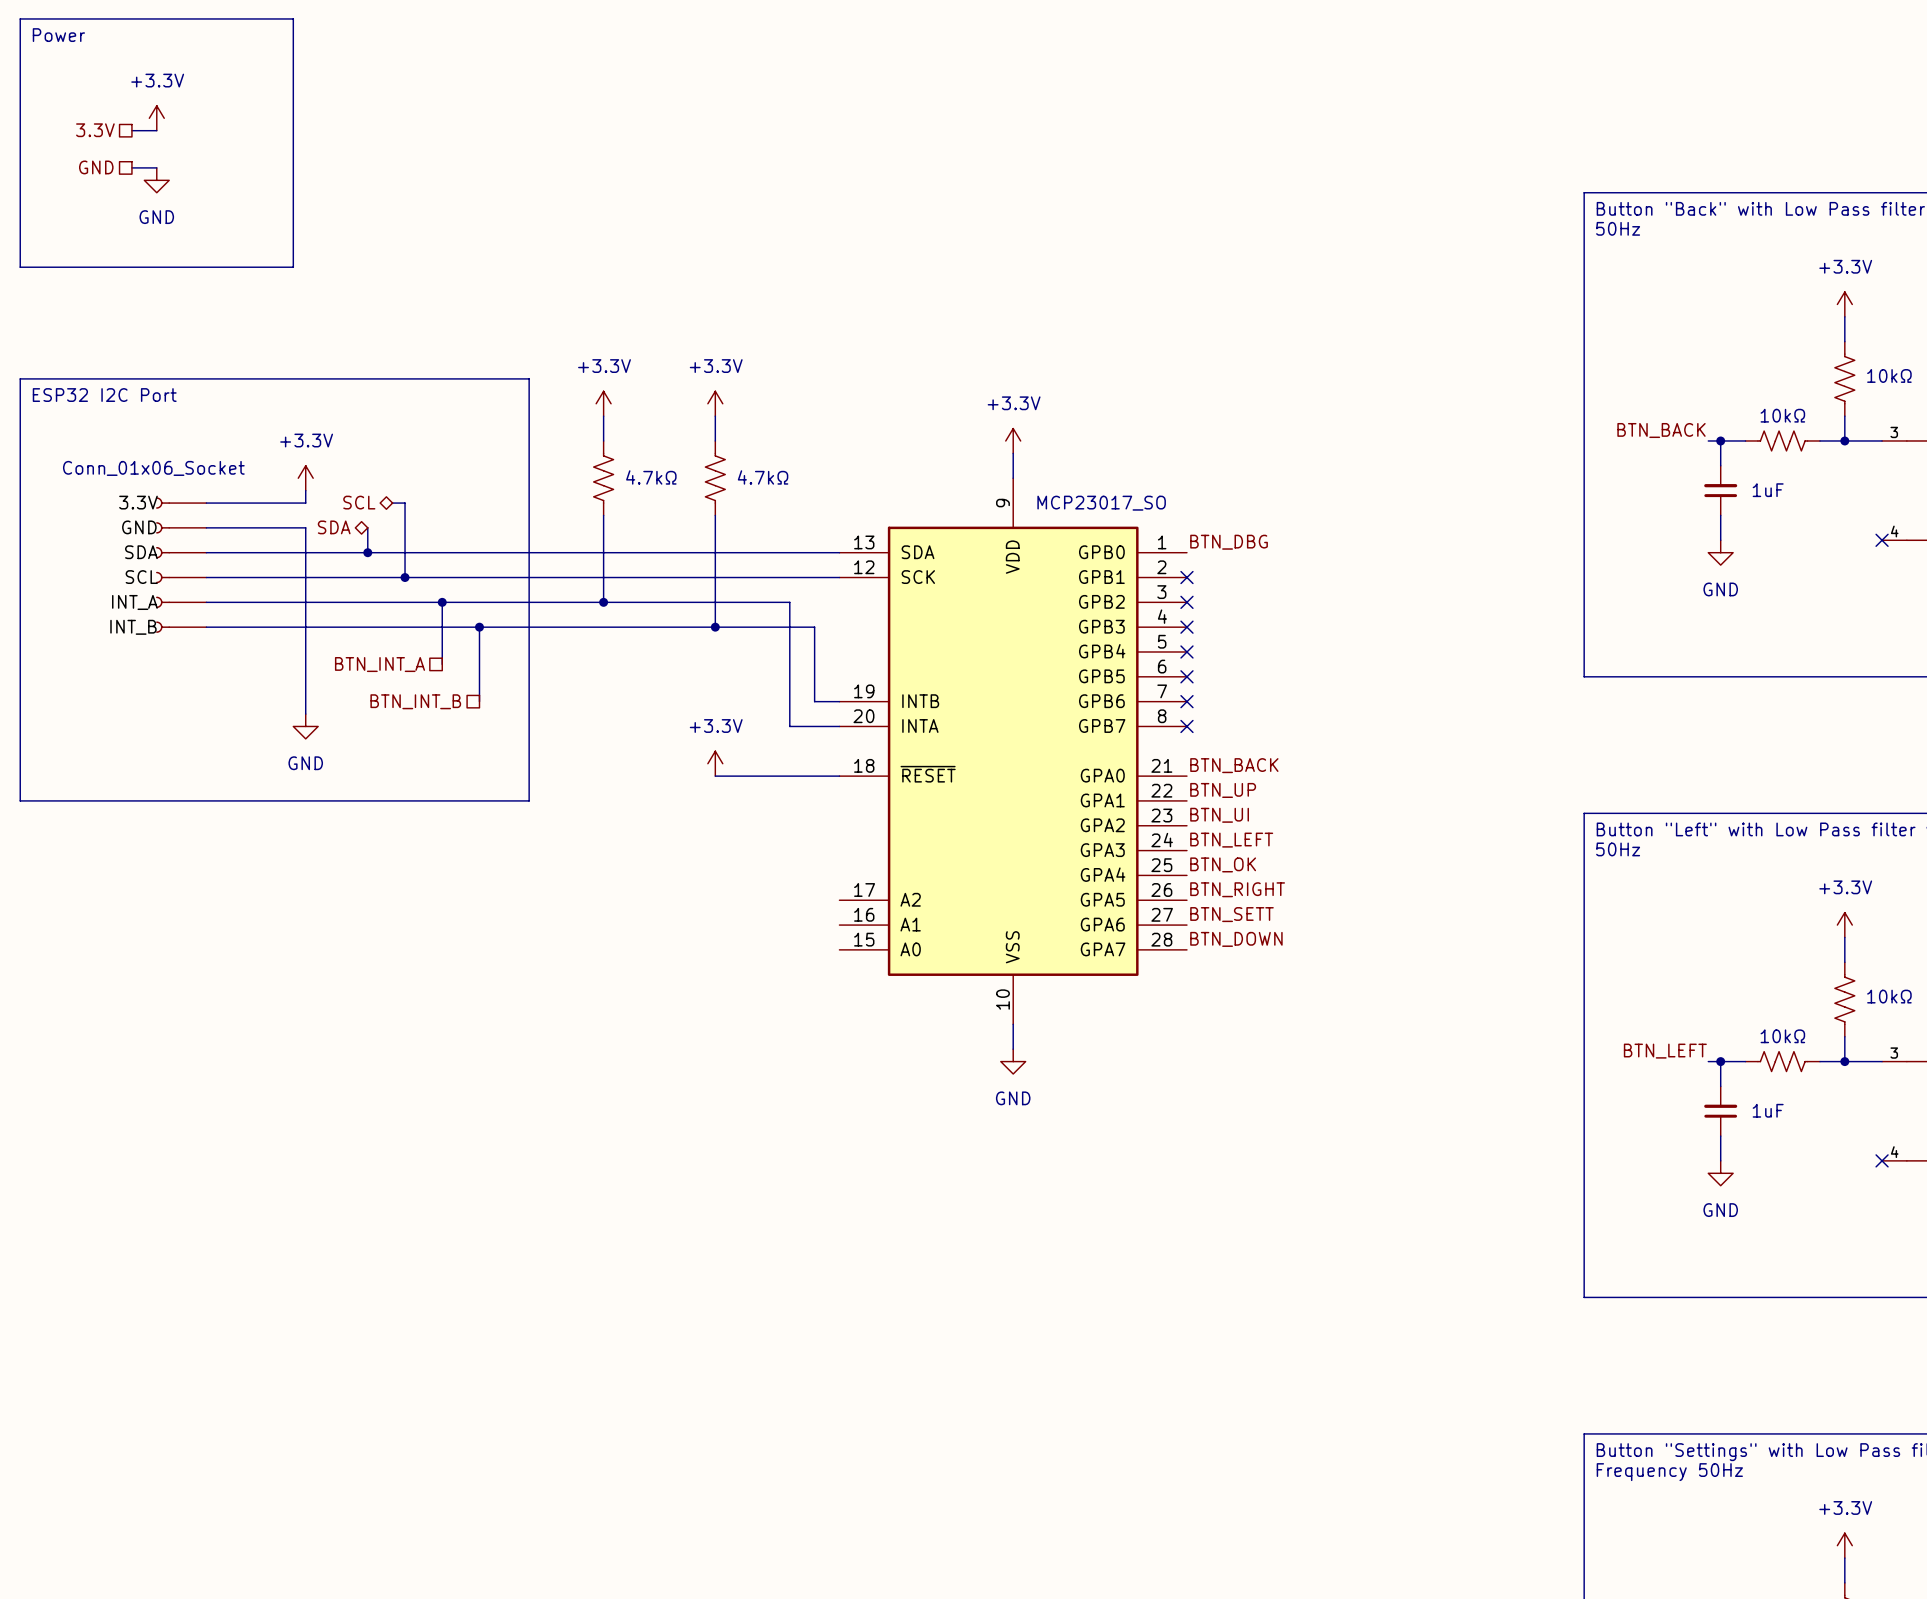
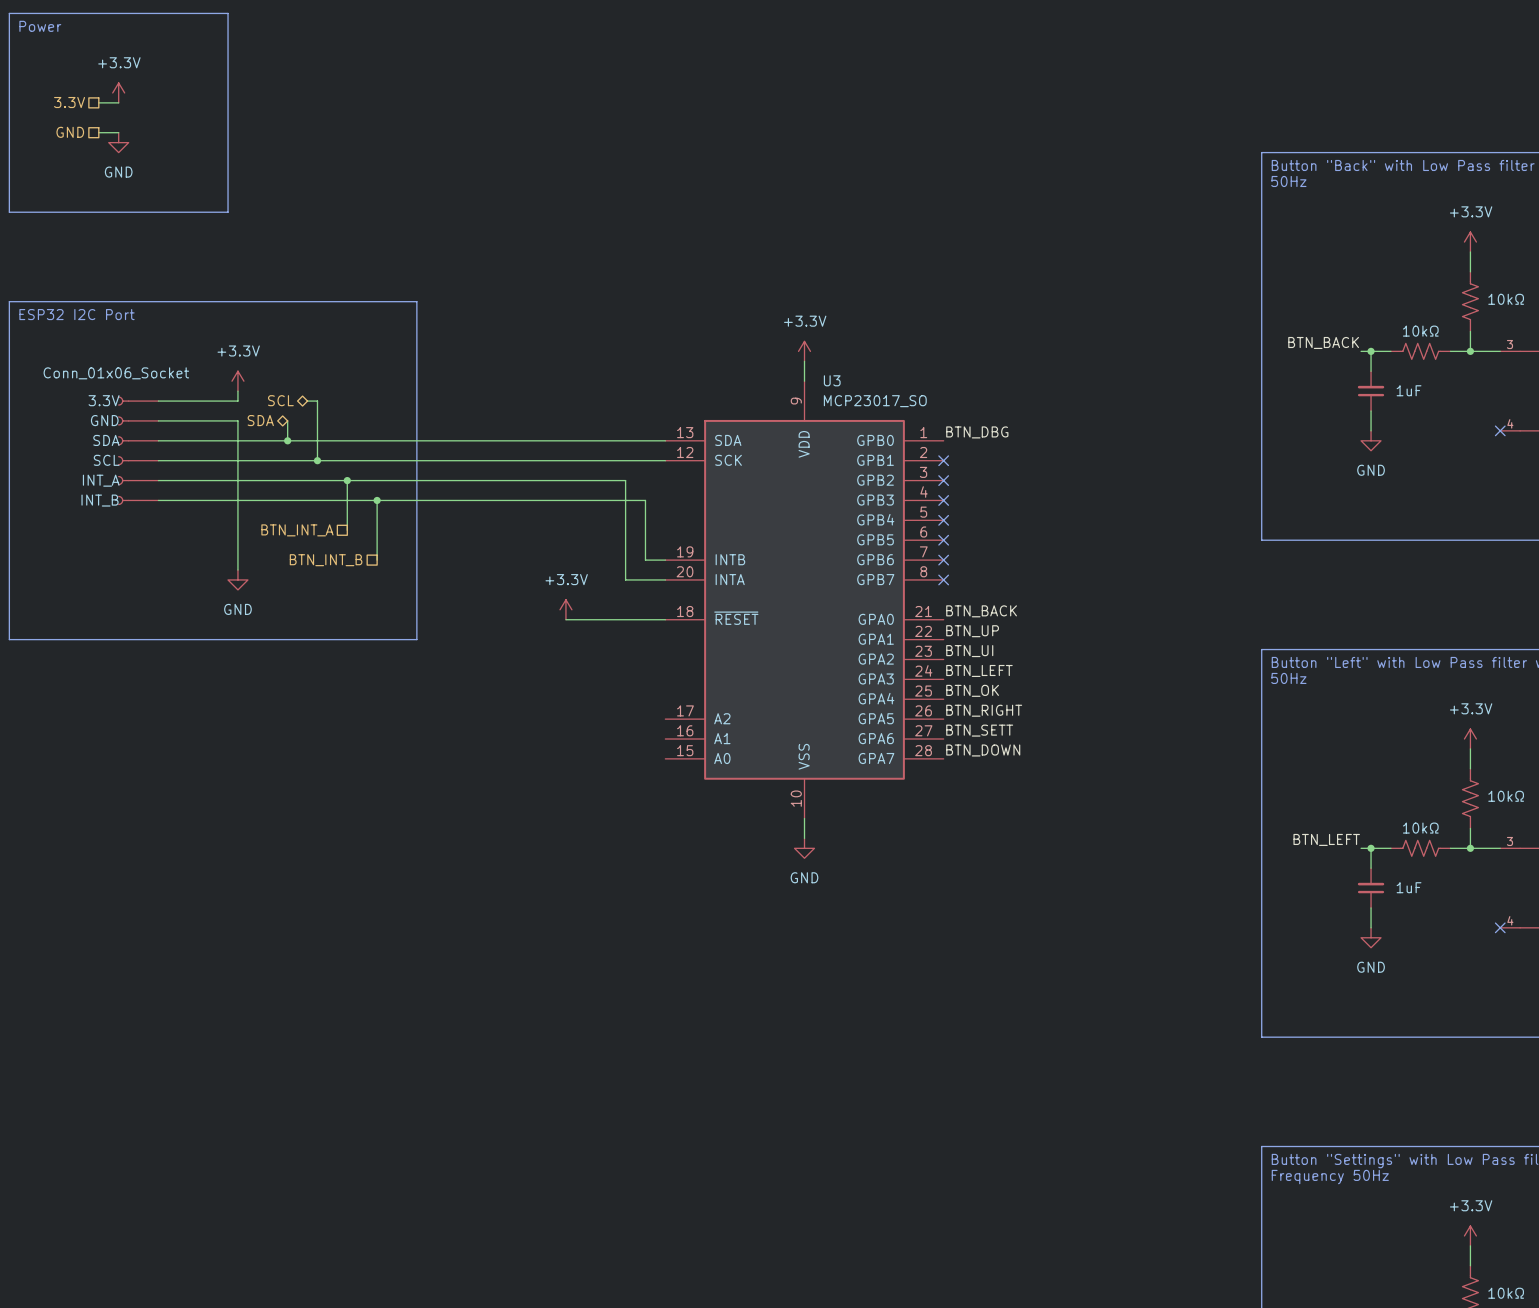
power symbol: +3.3V (603, 403) -> none
power symbol: +3.3V (715, 403) -> none
wire: (603, 416) (603, 440) -> none
wire: (715, 416) (715, 440) -> none
U3 name: none -> U3 (832, 380)
part: 4.7kΩ (603, 478) -> none
part: 4.7kΩ (715, 478) -> none
wire: (603, 515) (603, 602) -> none
wire: (715, 515) (715, 627) -> none
junction: (603, 602) -> none
junction: (715, 627) -> none

